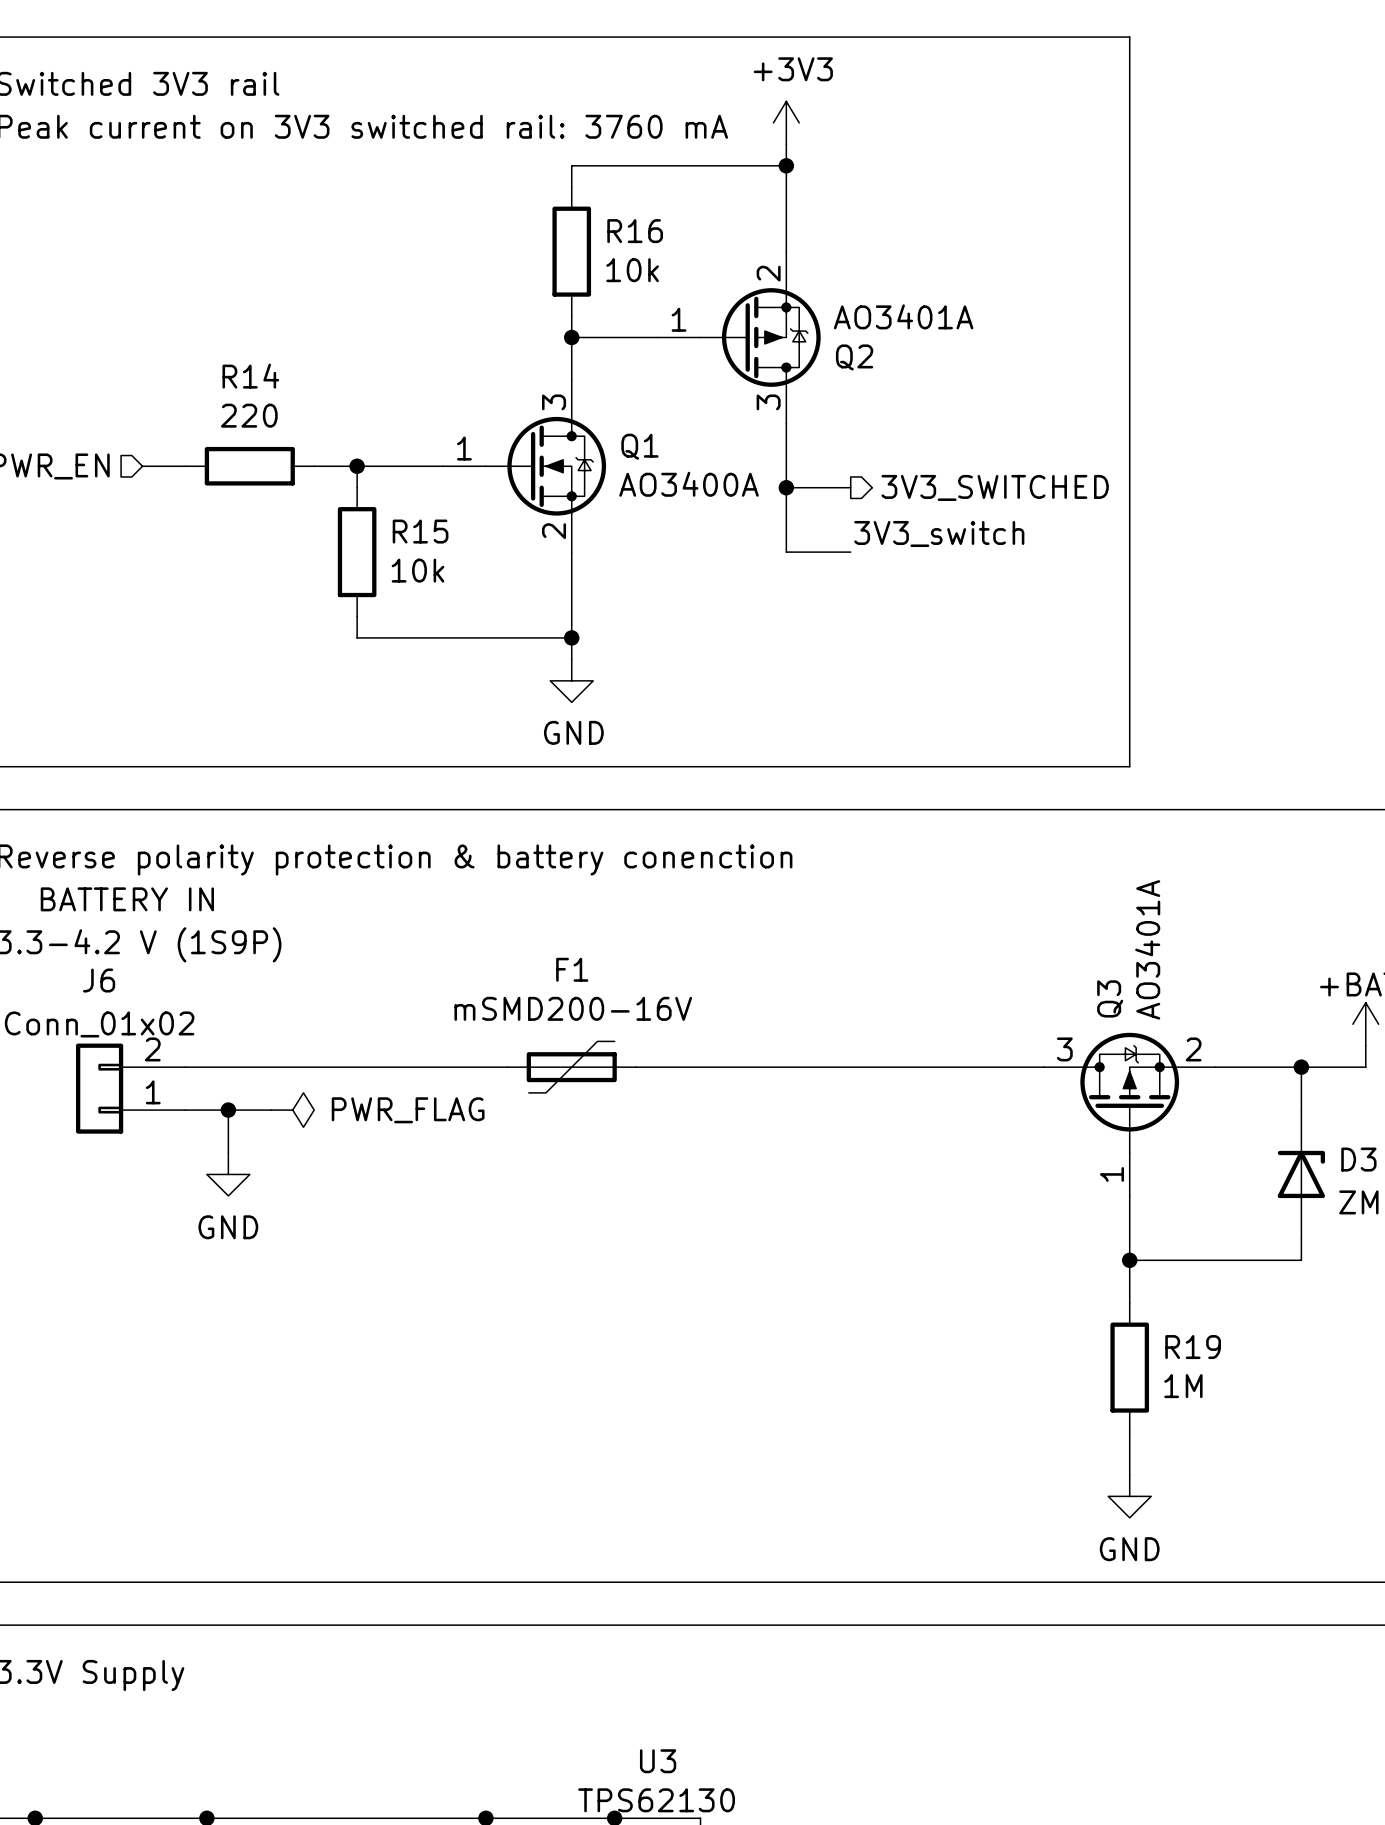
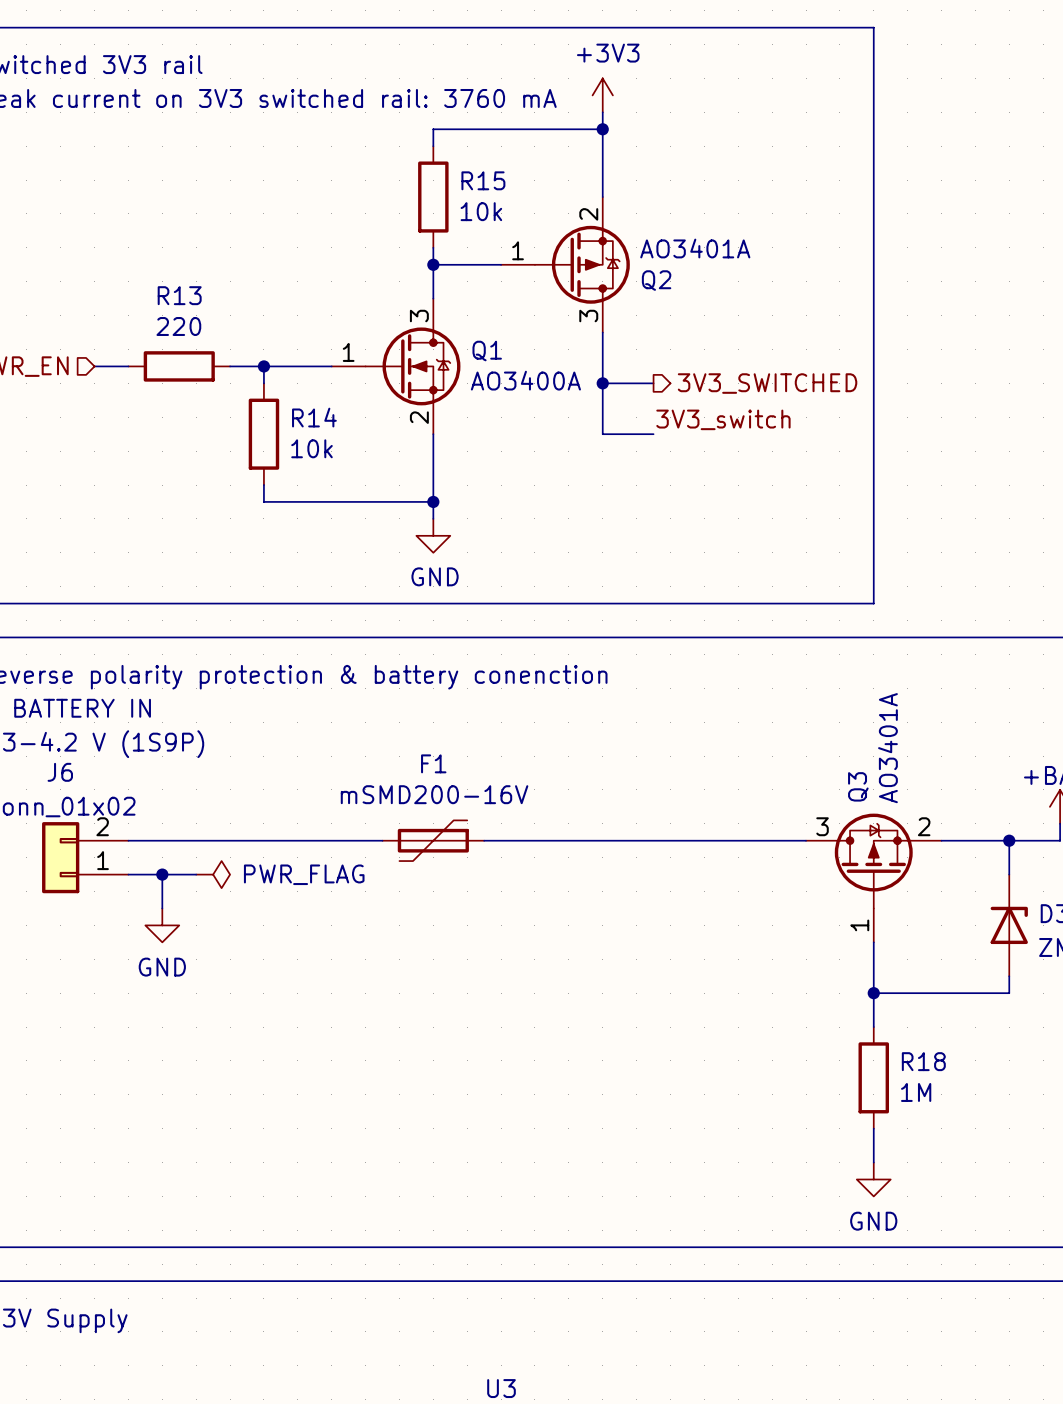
R16 name: R16 (635, 231) -> R15 (483, 180)
R14 name: R14 (250, 376) -> R13 (179, 295)
R15 name: R15 (420, 531) -> R14 (314, 417)
R19 name: R19 (1193, 1347) -> R18 (923, 1061)

